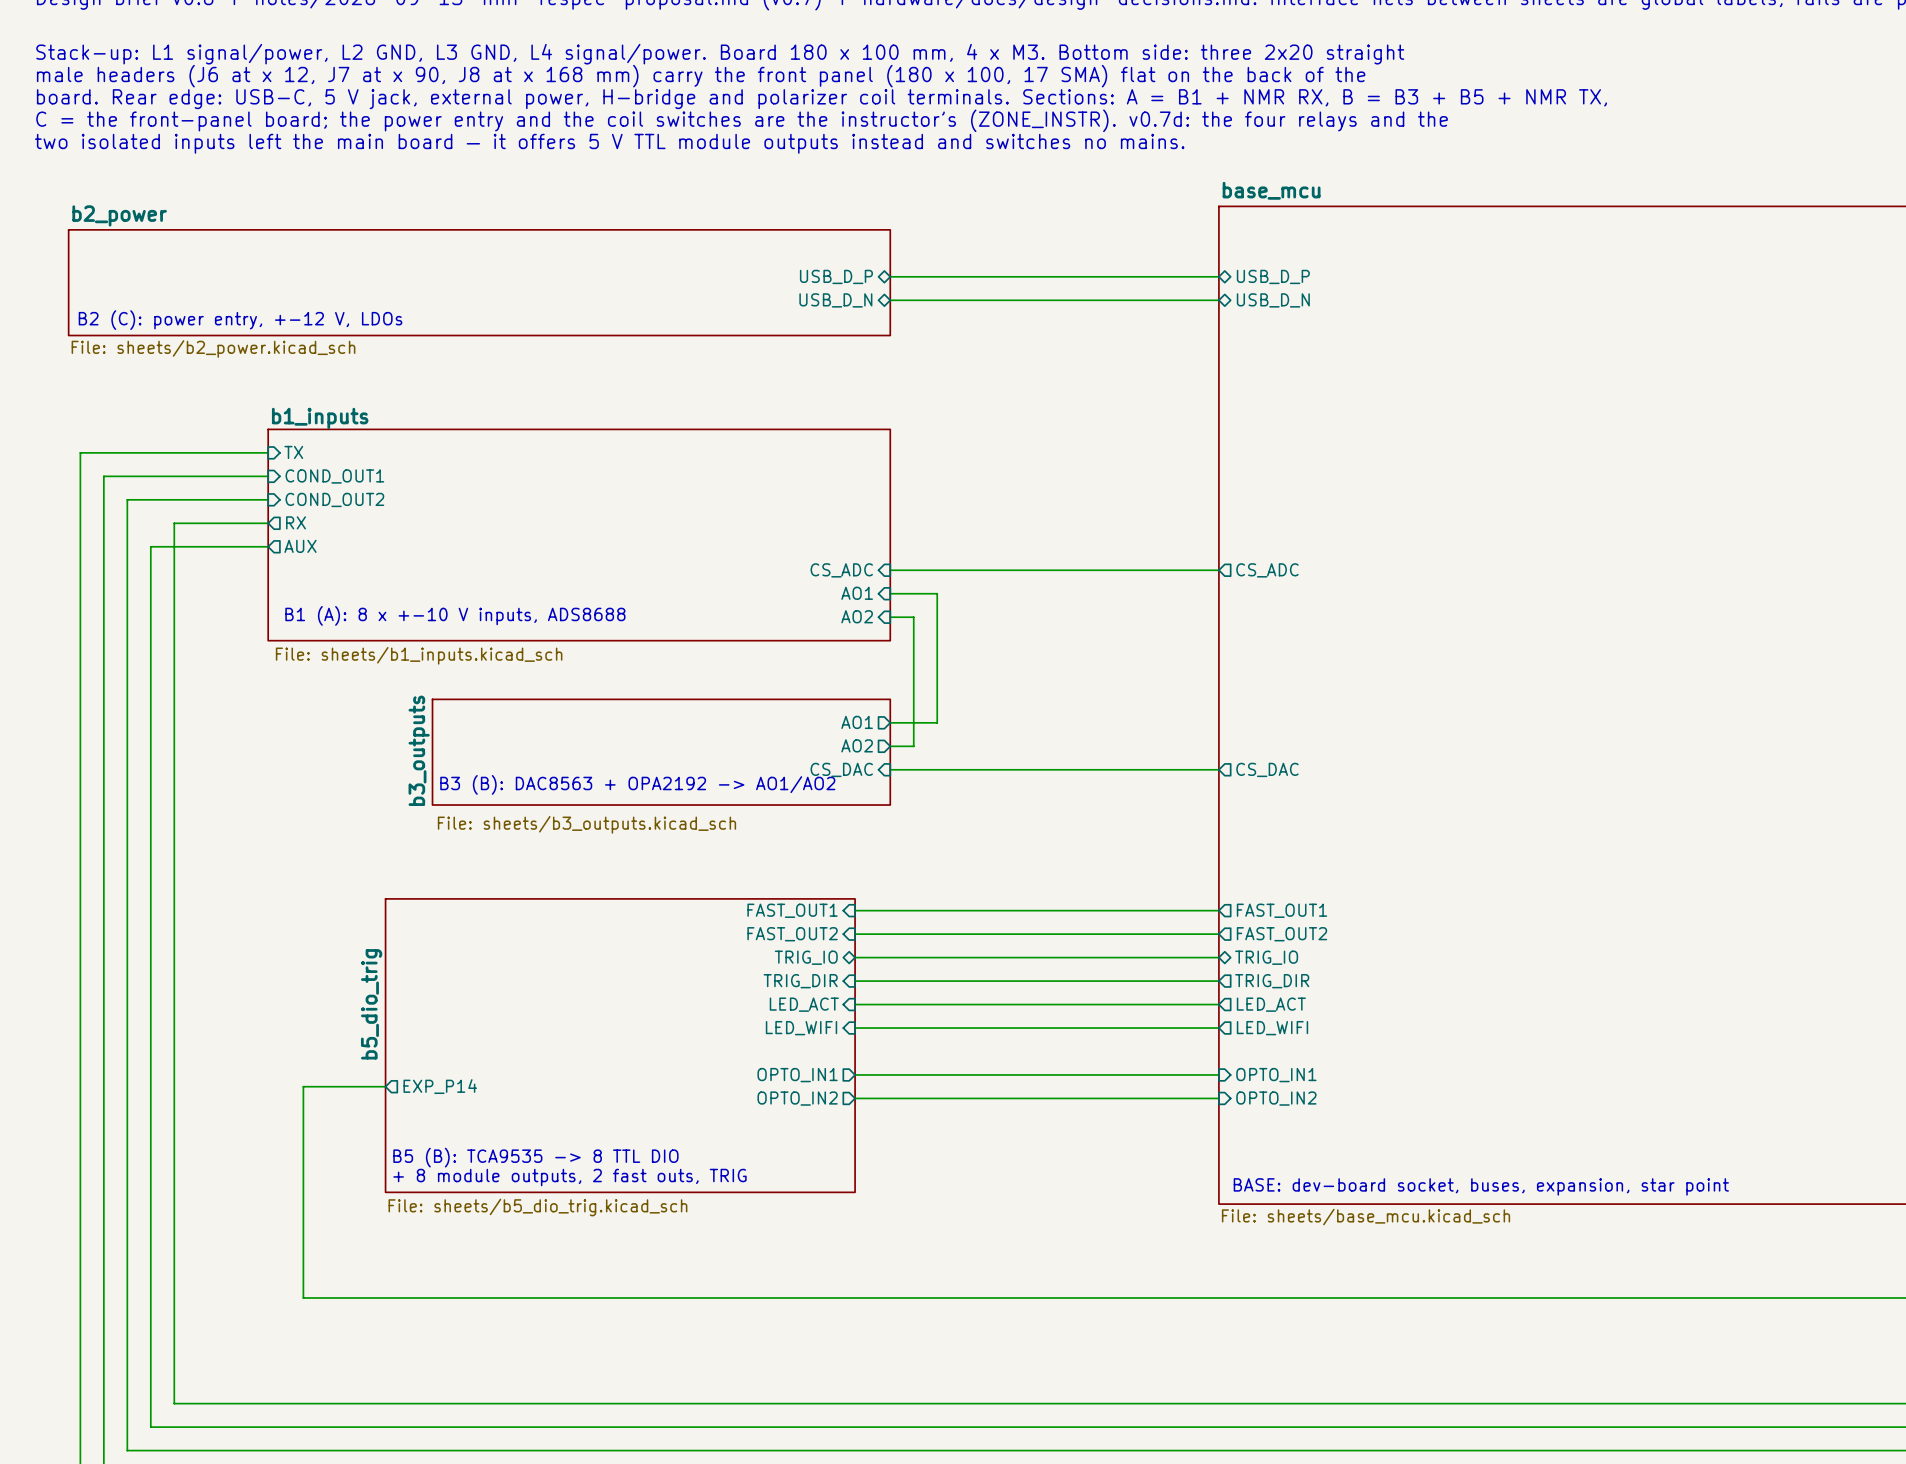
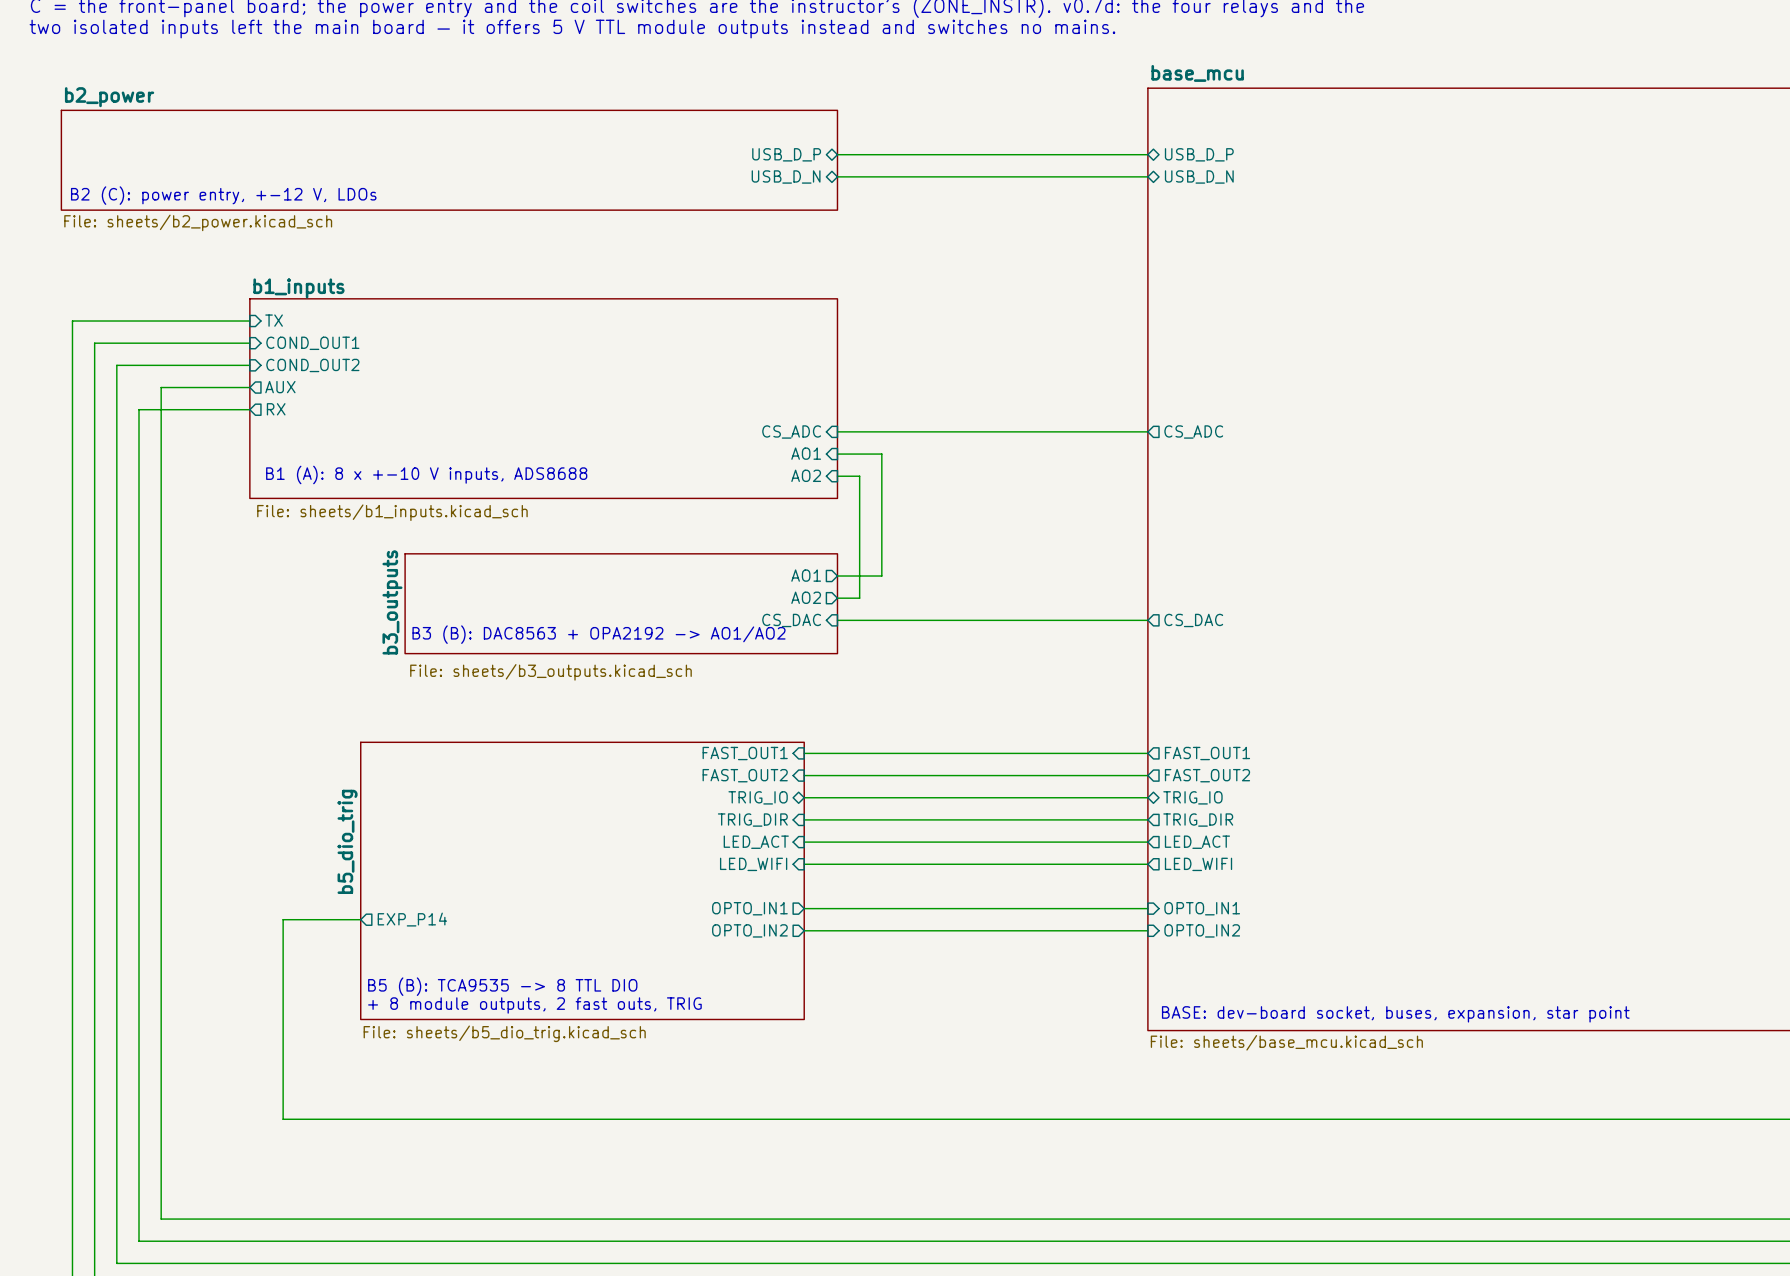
sheet pin: RX (296, 522) -> AUX (280, 387)
sheet pin: AUX (300, 546) -> RX (276, 409)

